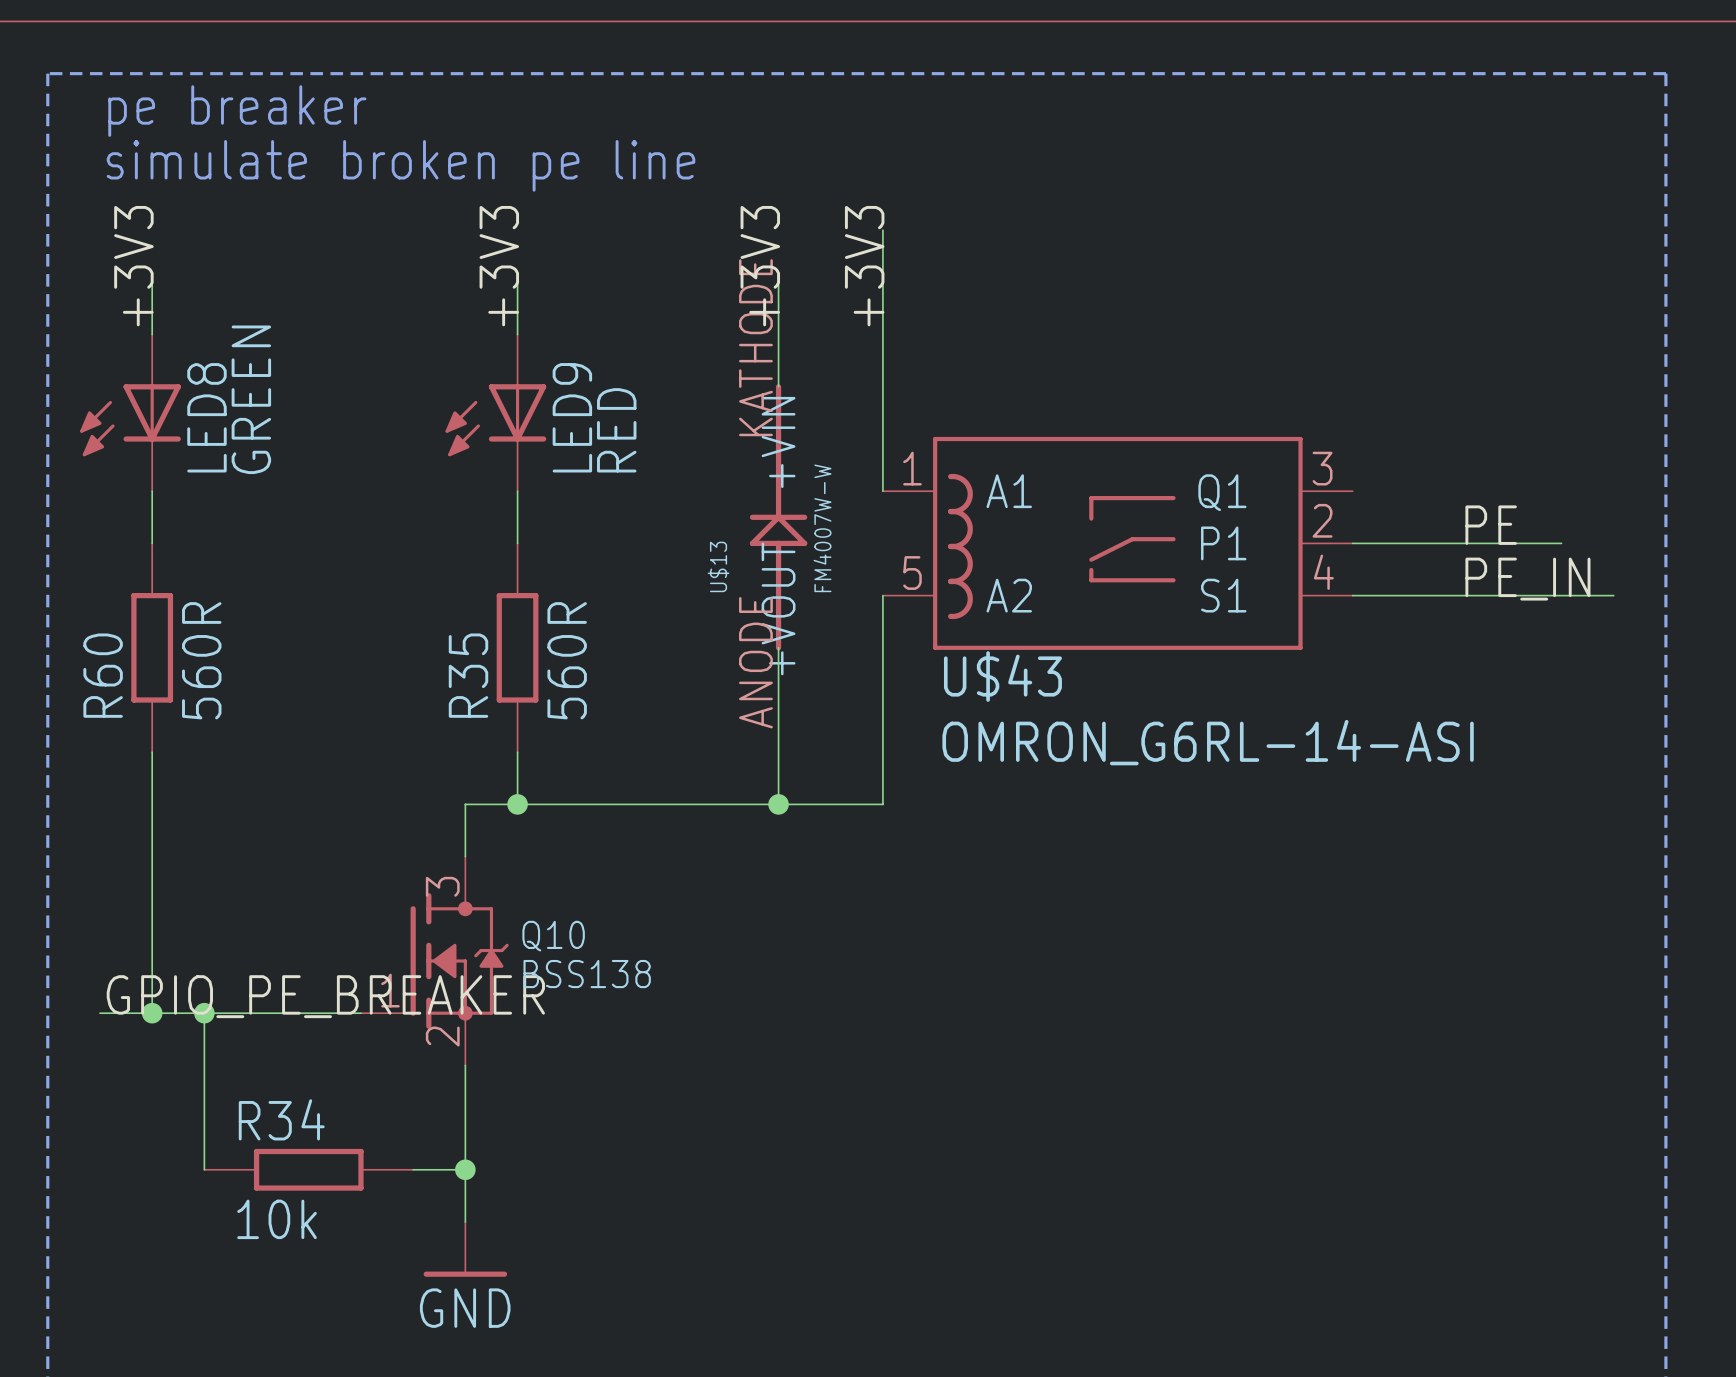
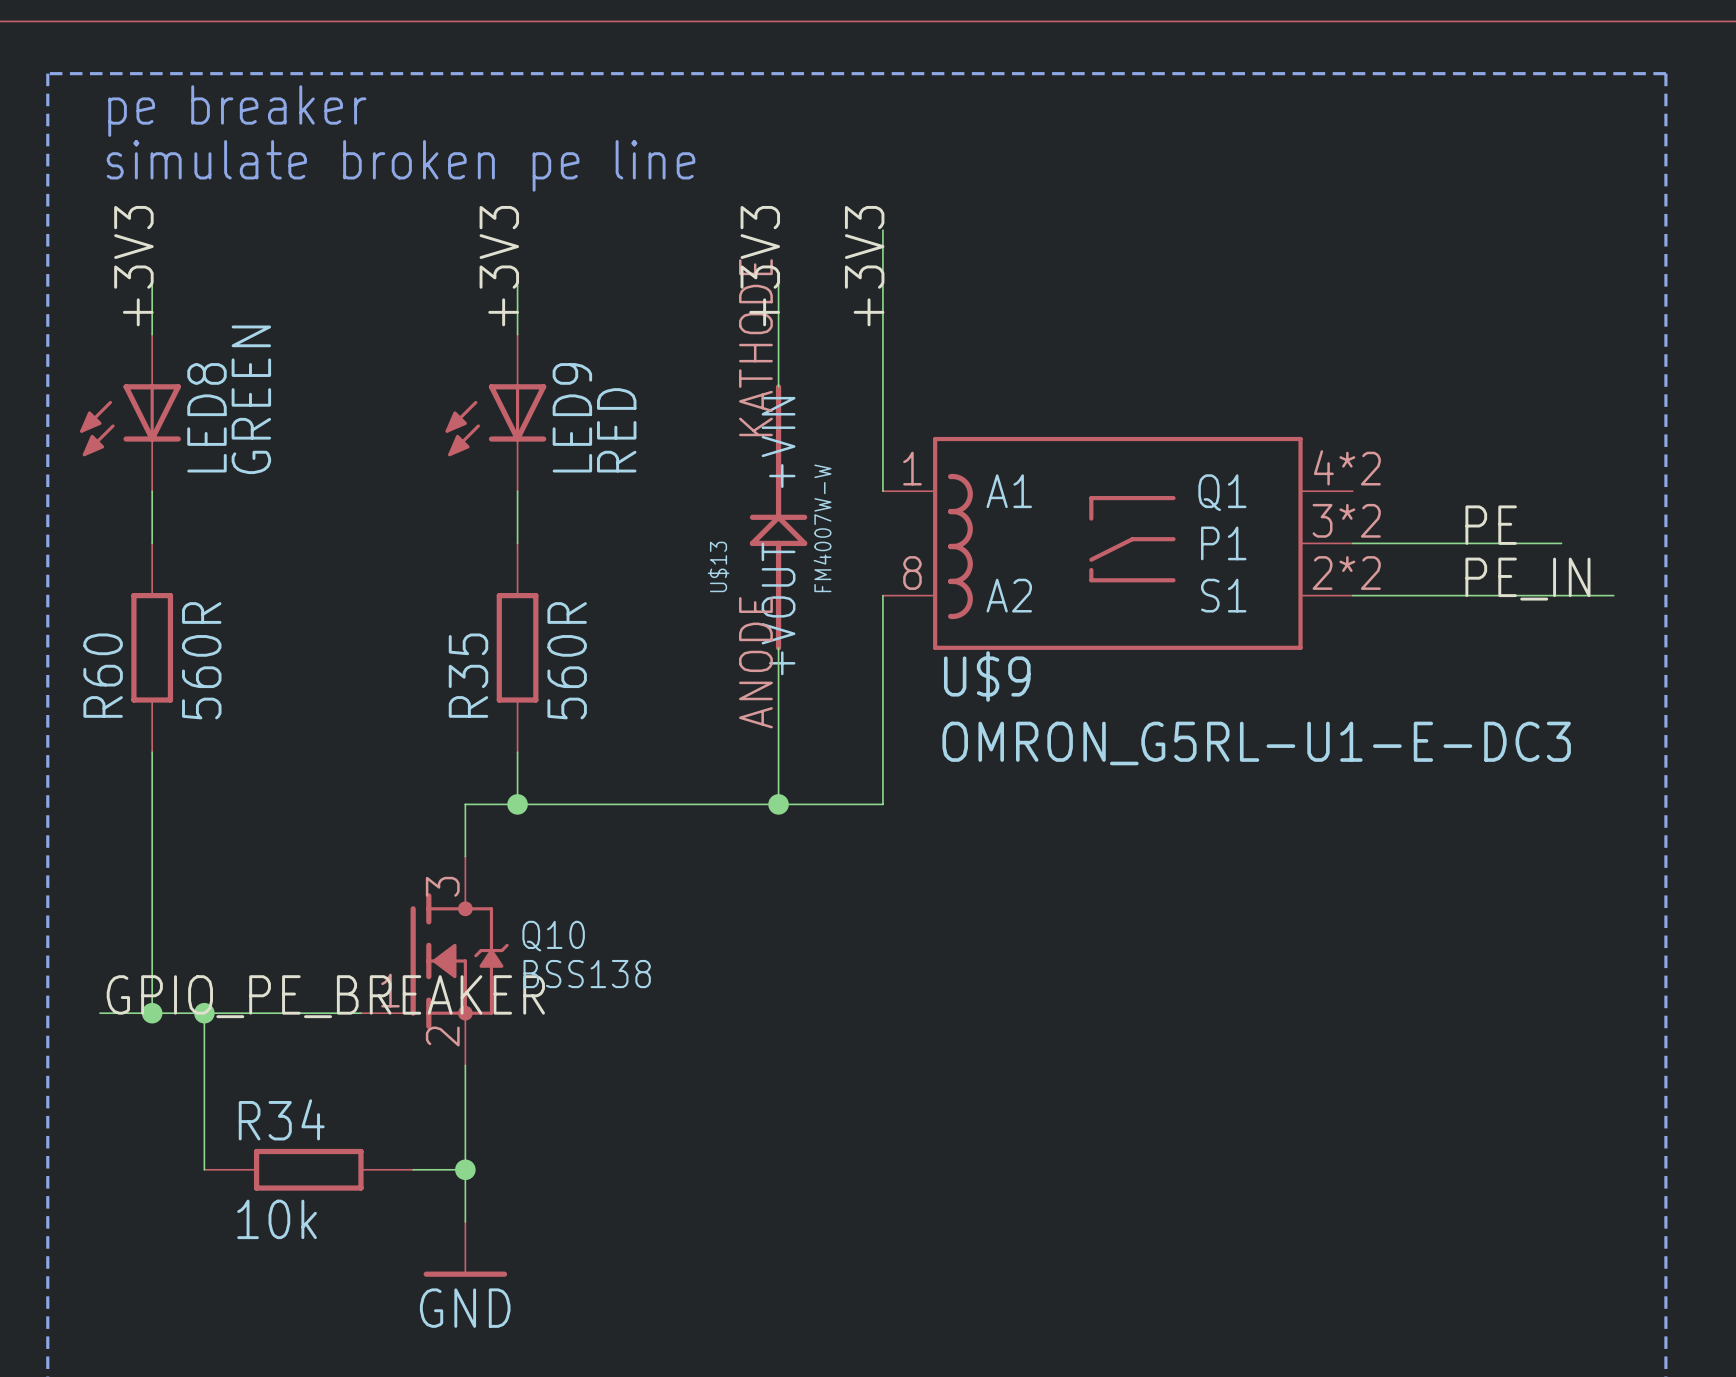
U$43 pin number: 3 (1322, 468) -> 4*2 (1347, 467)
U$43 pin number: 2 (1322, 520) -> 3*2 (1346, 520)
U$43 pin number: 4 (1323, 572) -> 2*2 (1346, 573)
U$43 pin number: 5 (912, 573) -> 8 (912, 573)
U$43 name: U$43 (1002, 676) -> U$9 (987, 676)
U$43 value: OMRON_G6RL-14-ASI (1208, 742) -> OMRON_G5RL-U1-E-DC3 (1256, 743)

